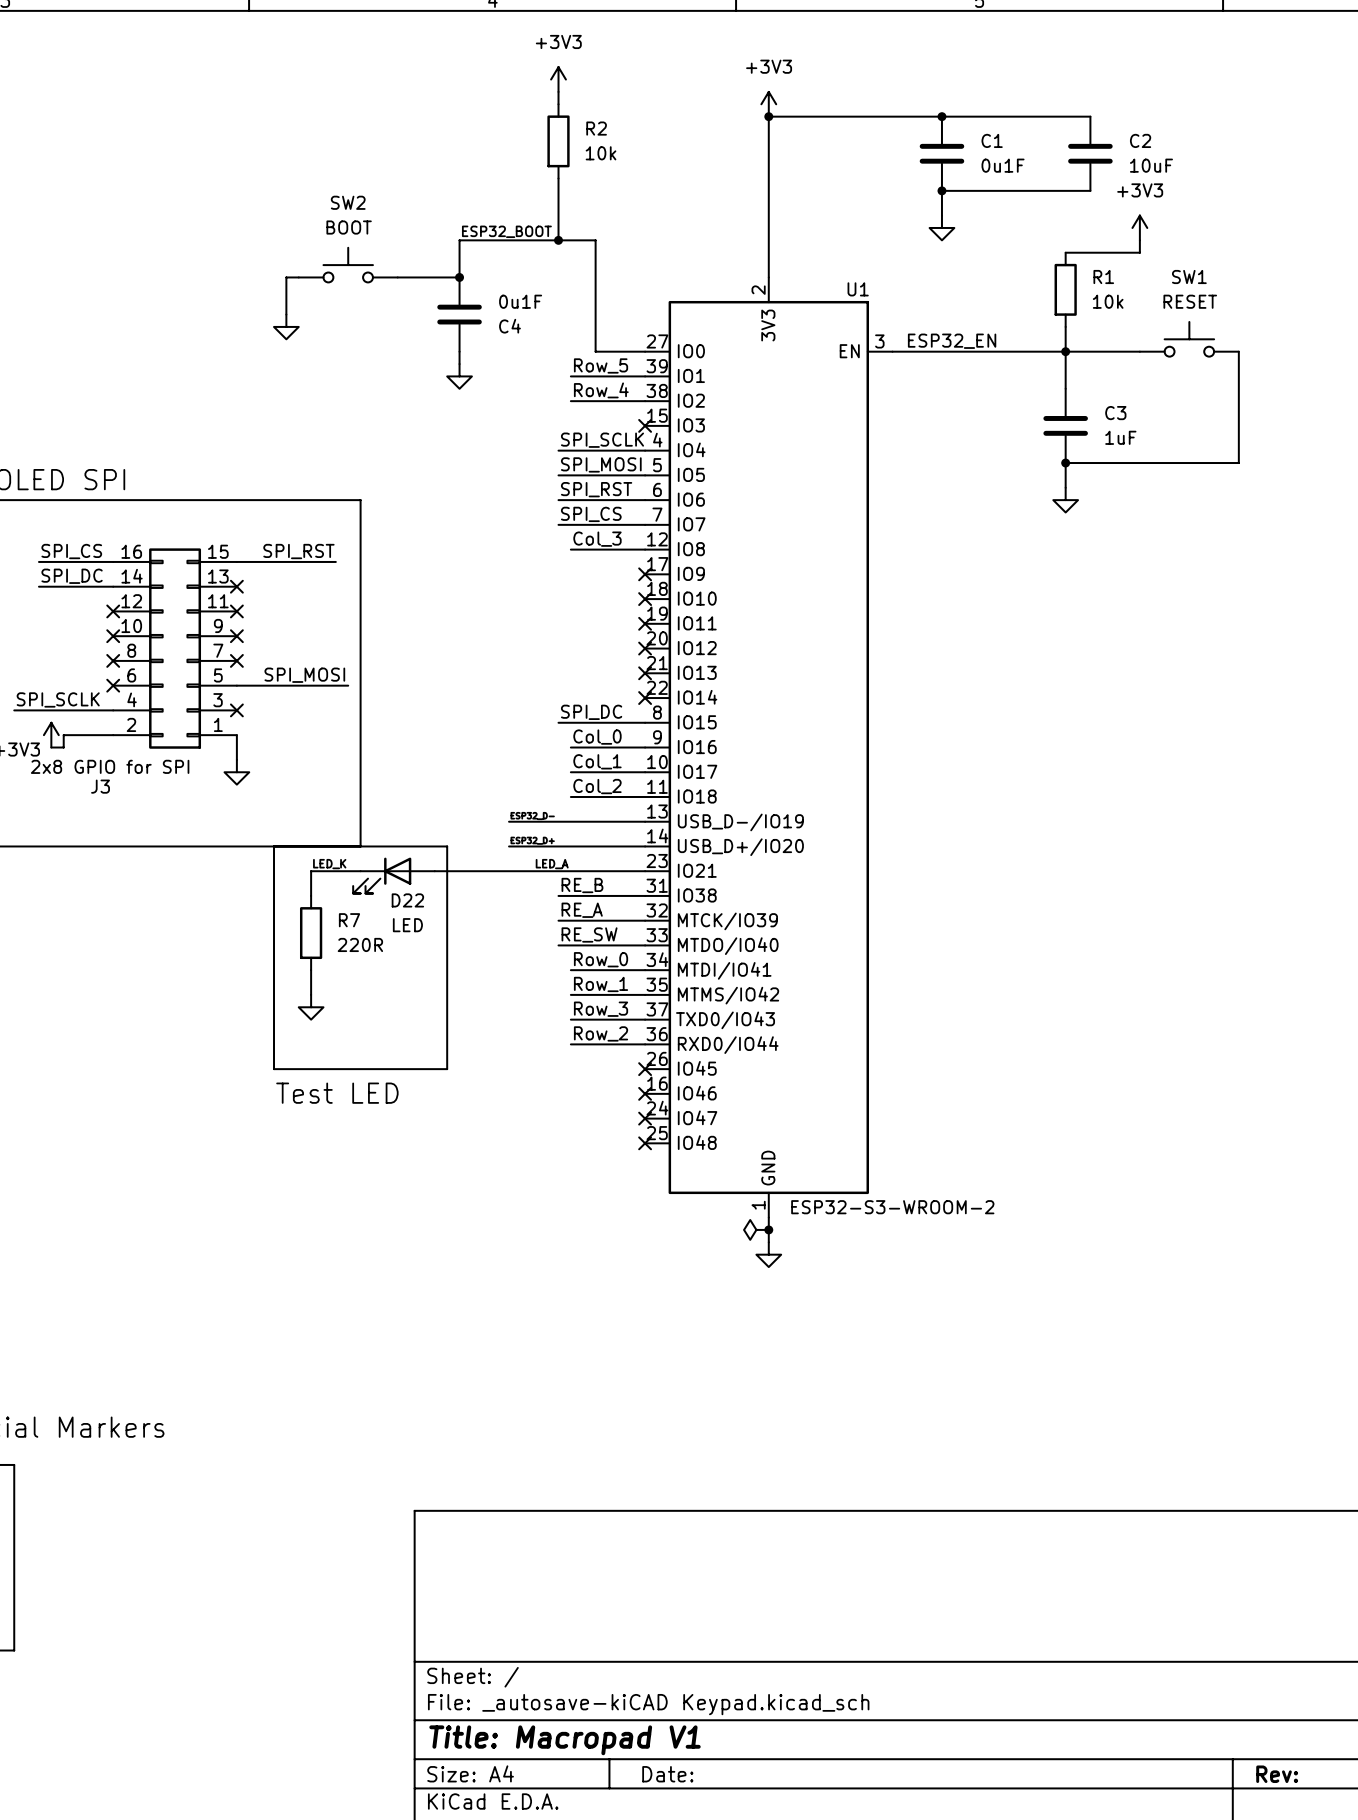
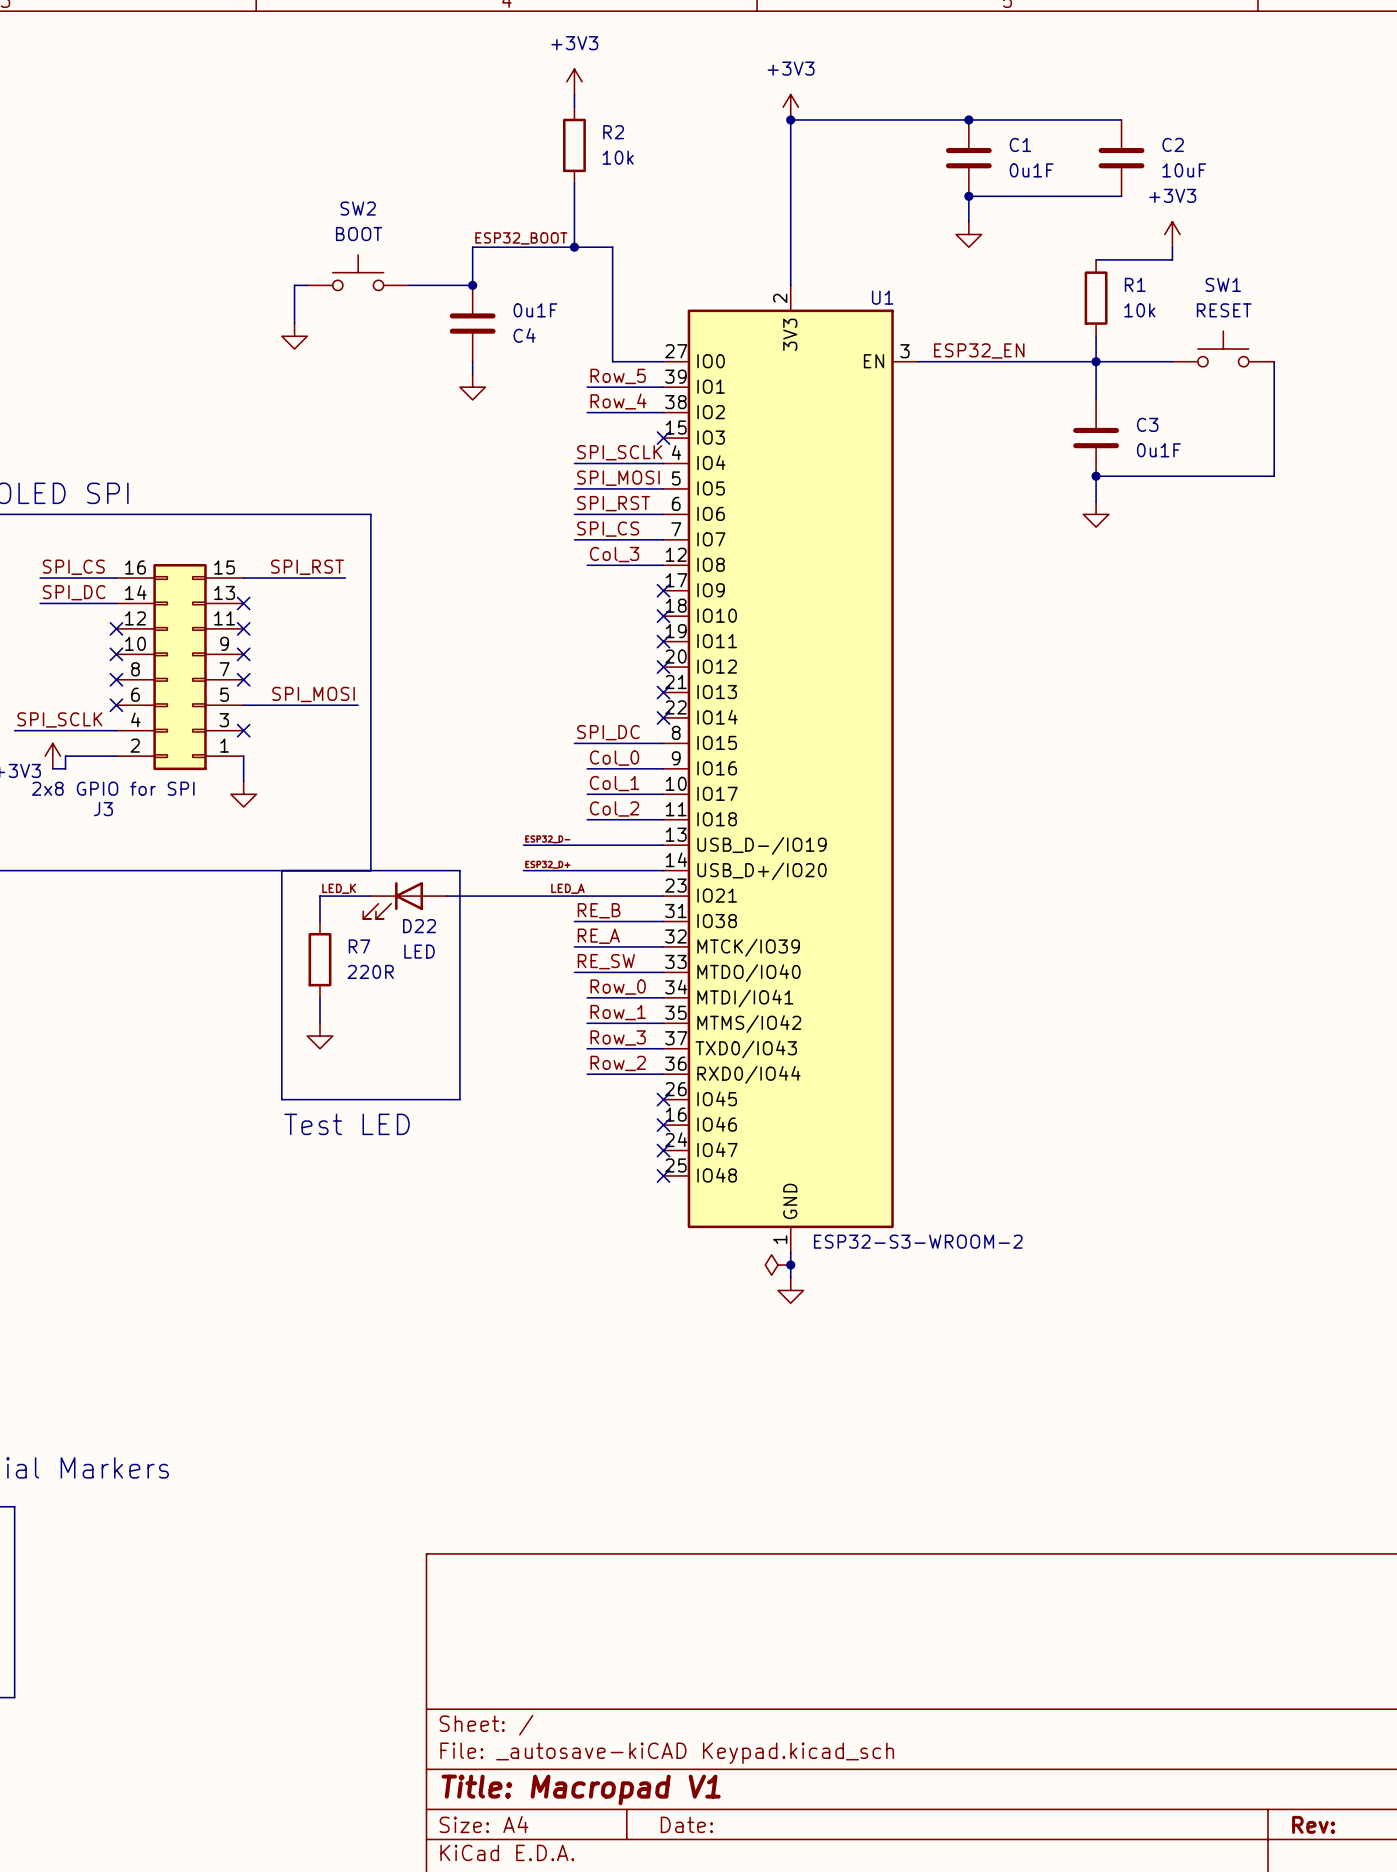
C3 value: 1uF (1120, 437) -> 0u1F (1158, 450)

